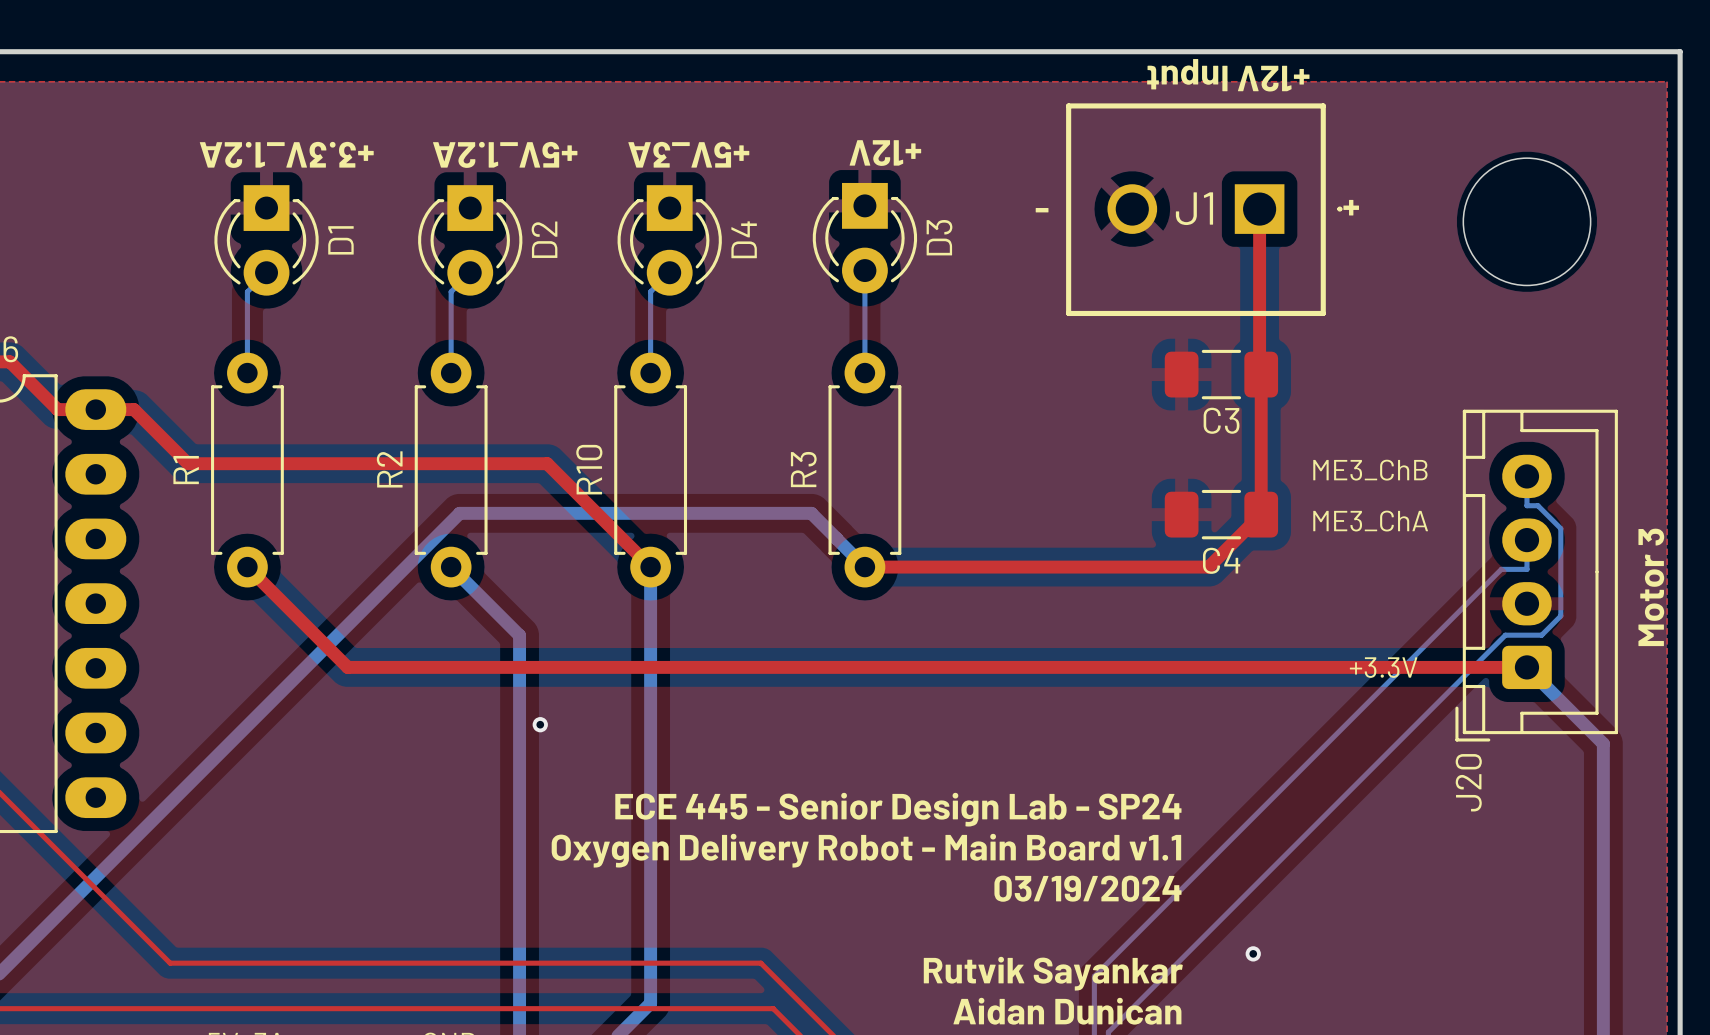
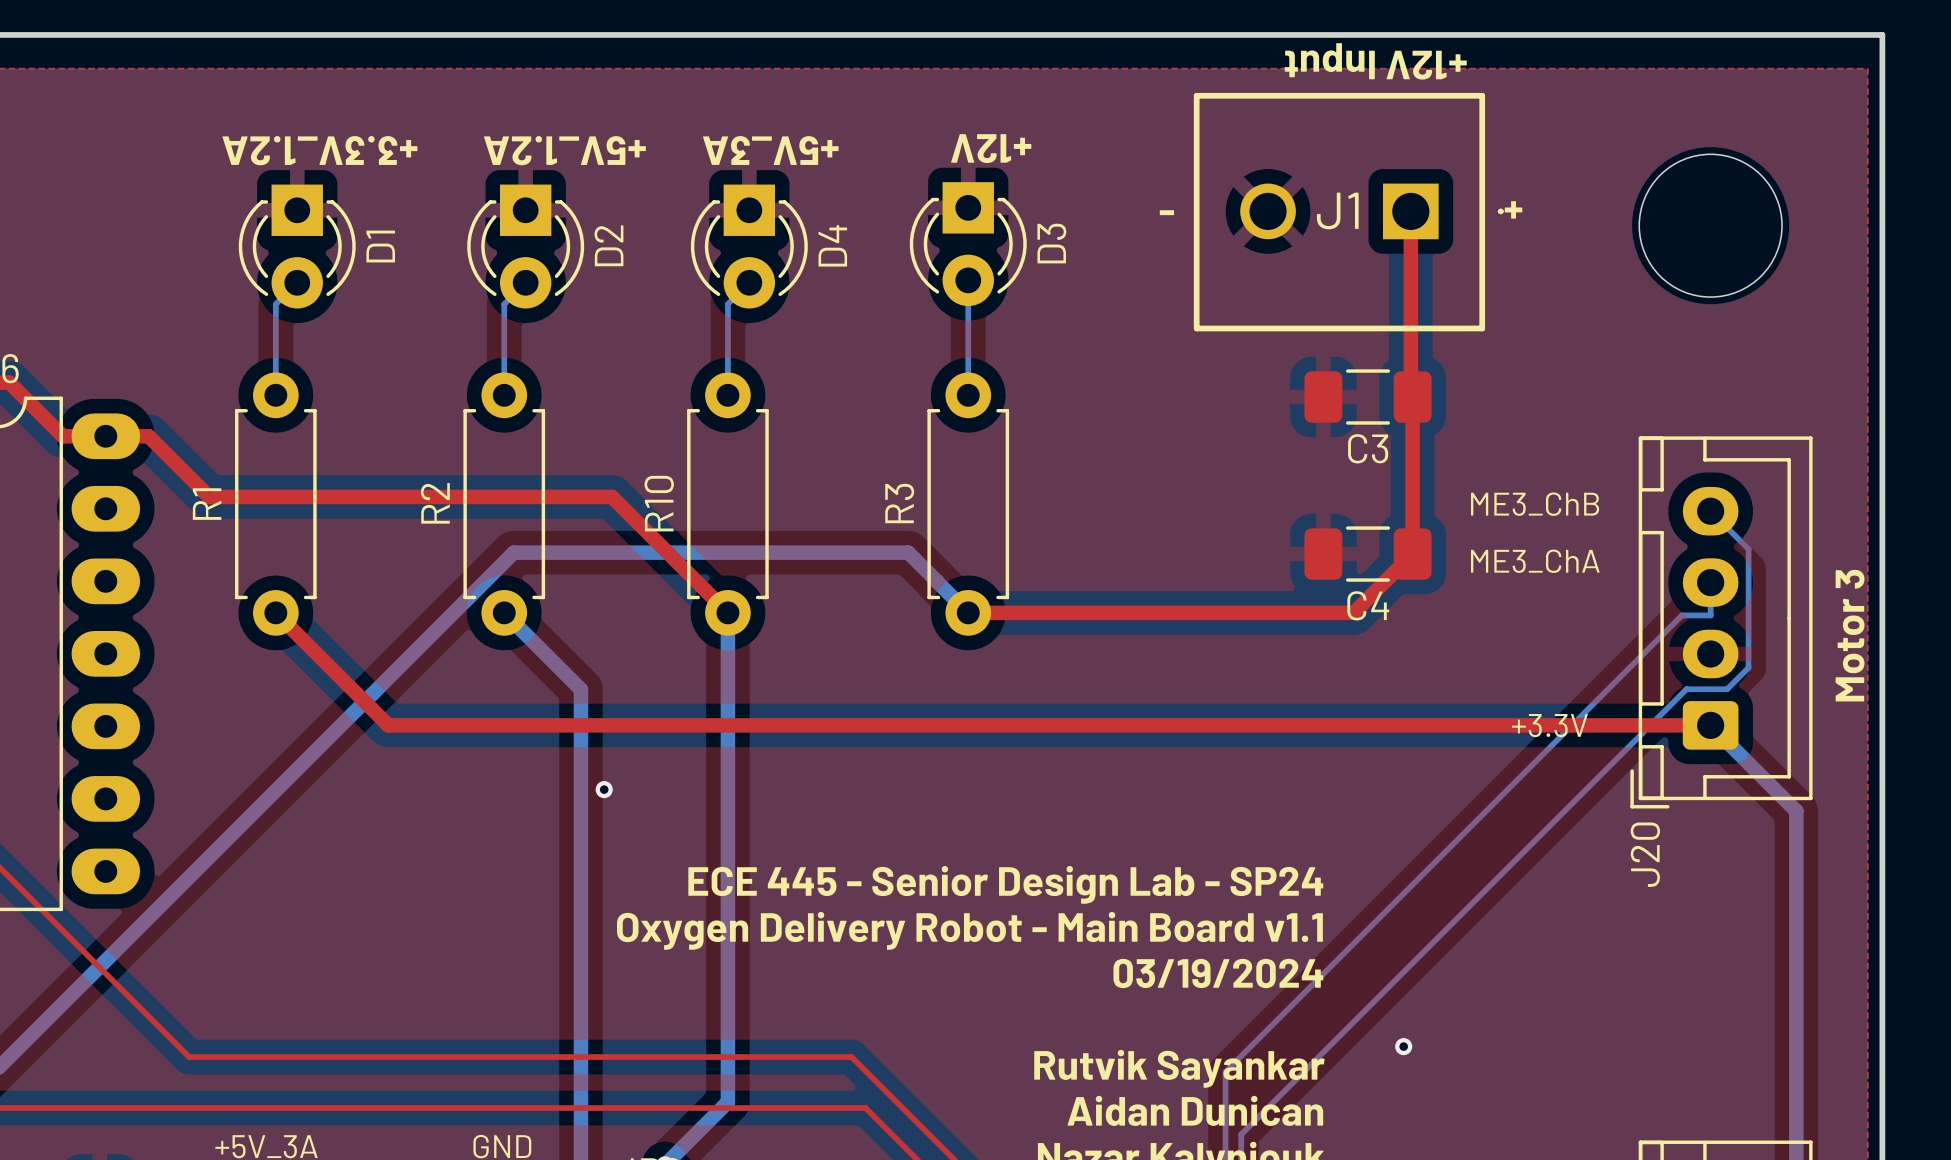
bottom track: (1526, 476) (1526, 505) (1537, 505) (1560, 528) -> (1710, 511) (1748, 549) (1748, 569)

